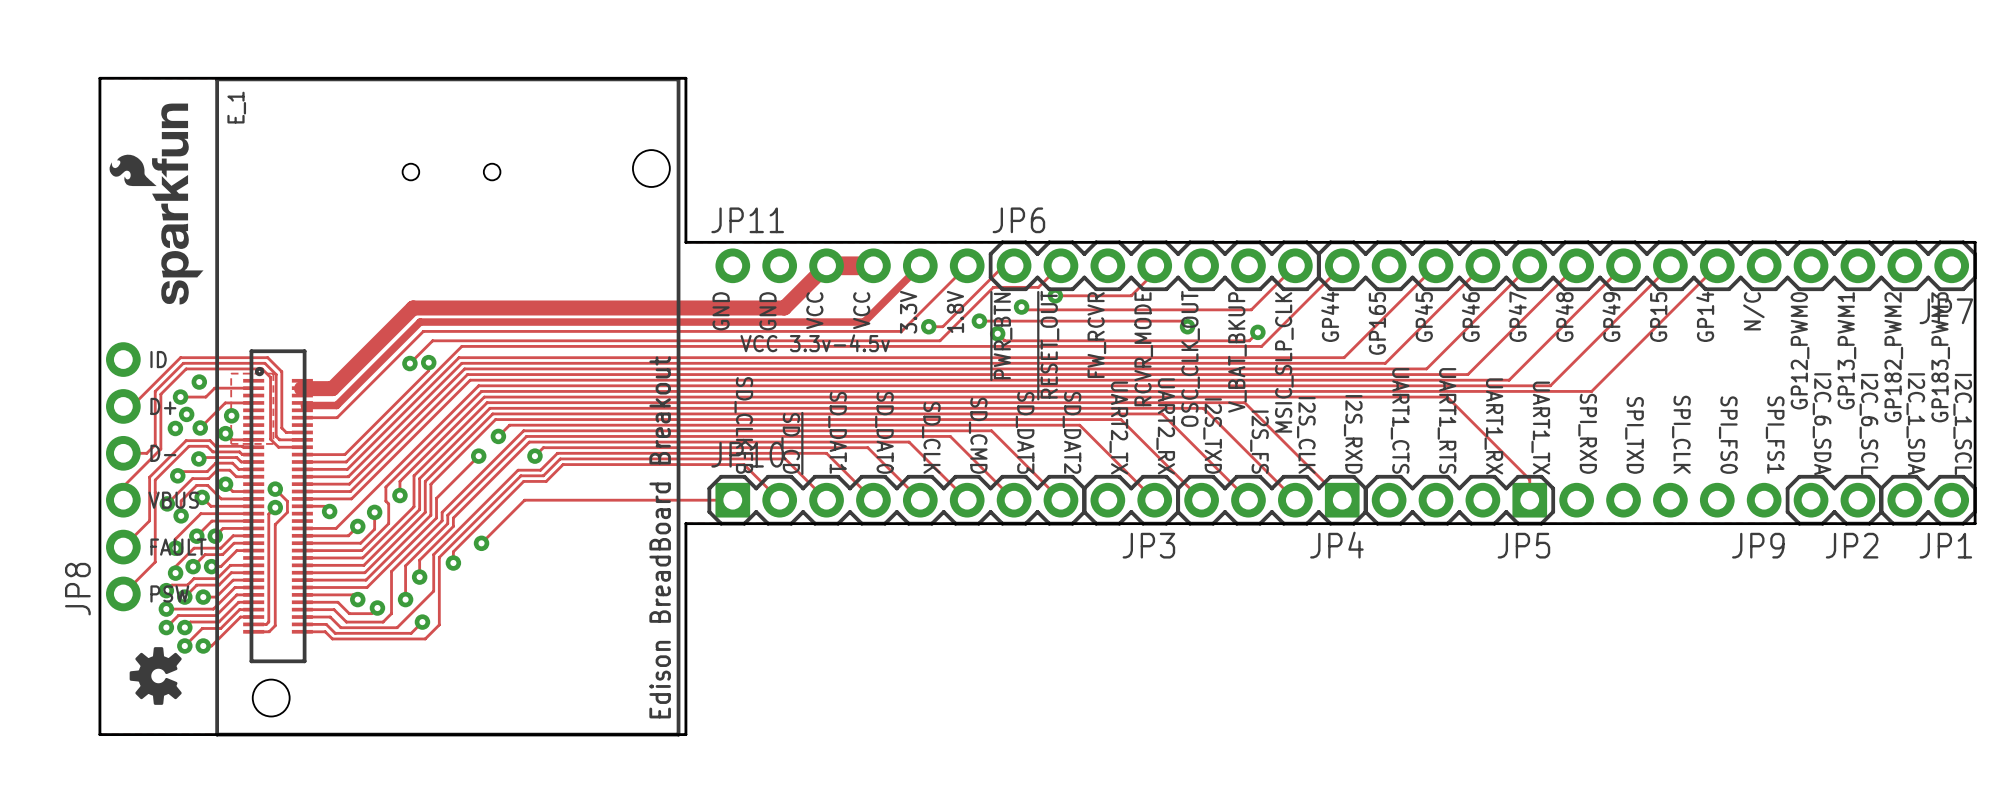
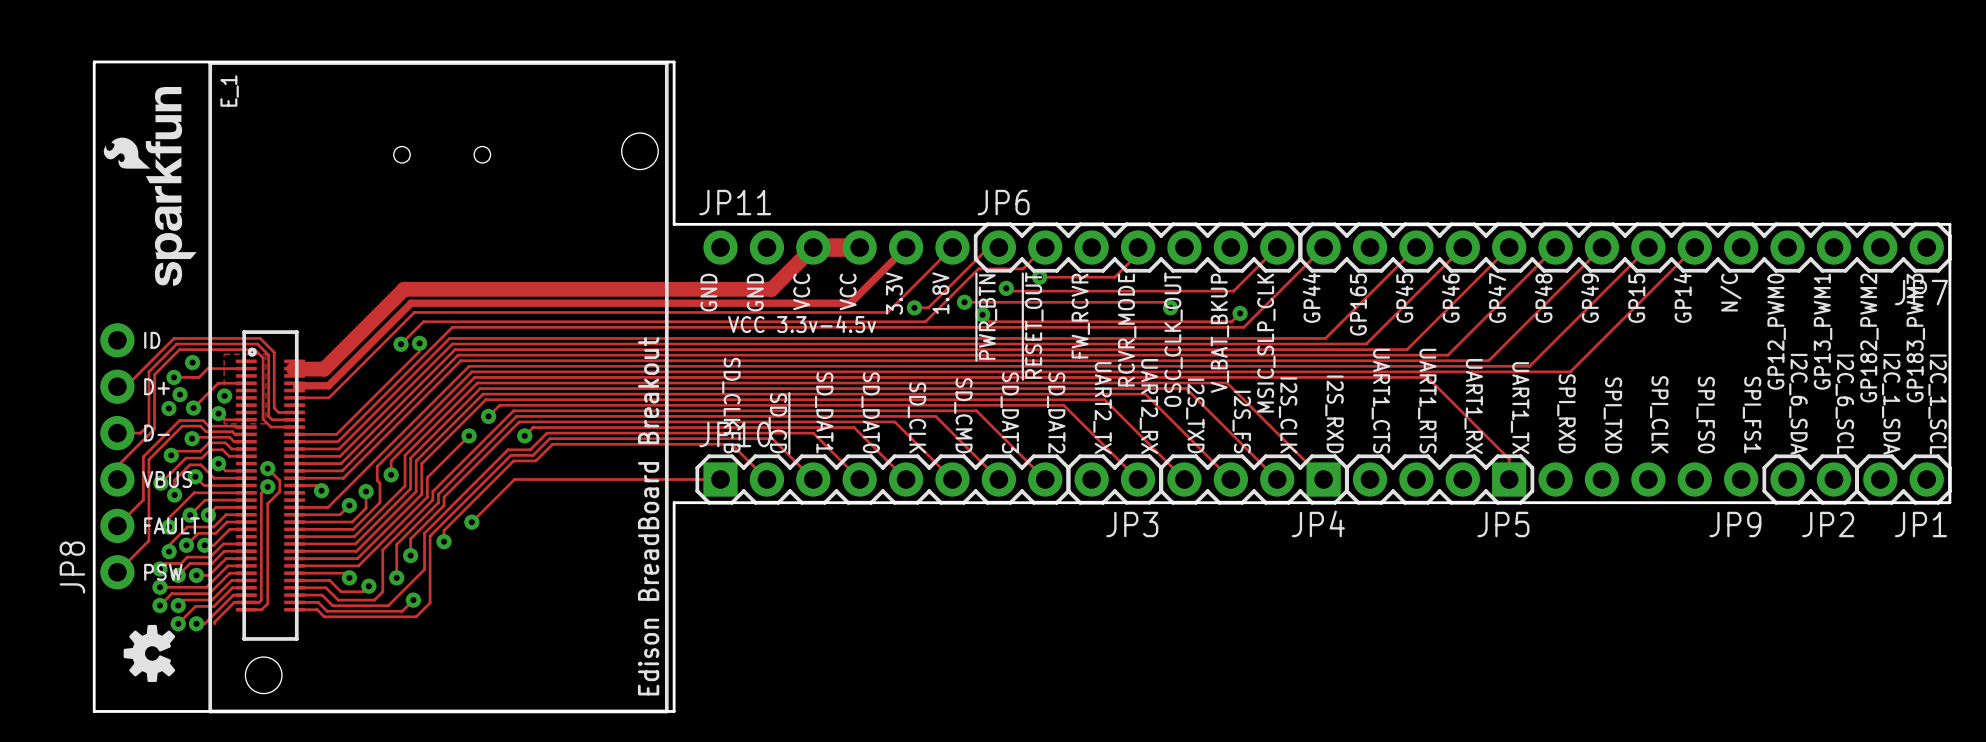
track: none -> (246, 602) (234, 602) (214, 623)

